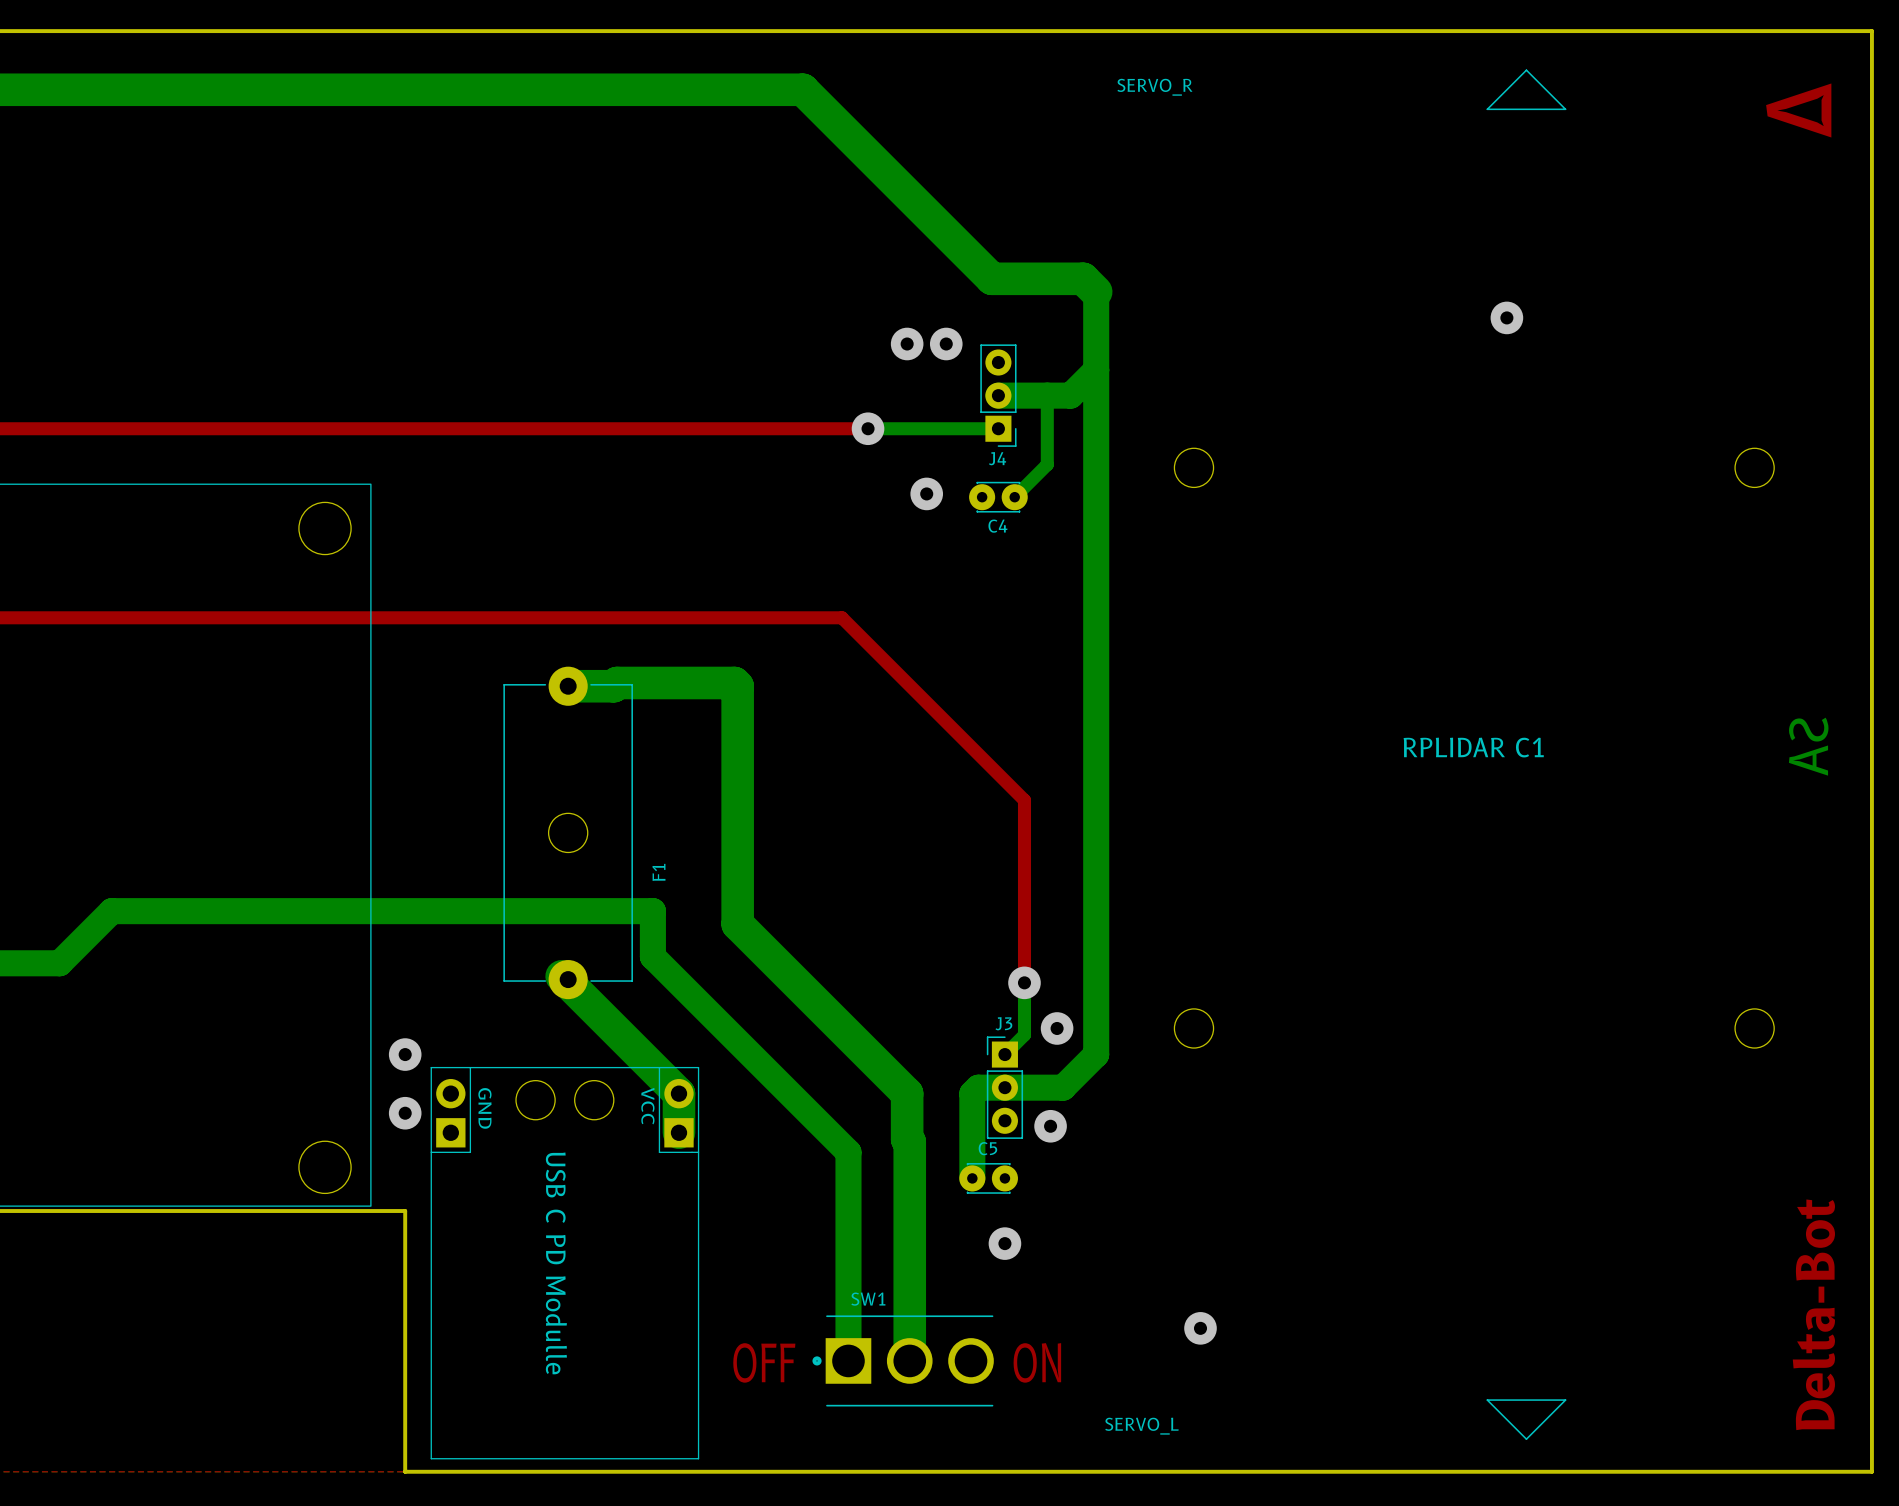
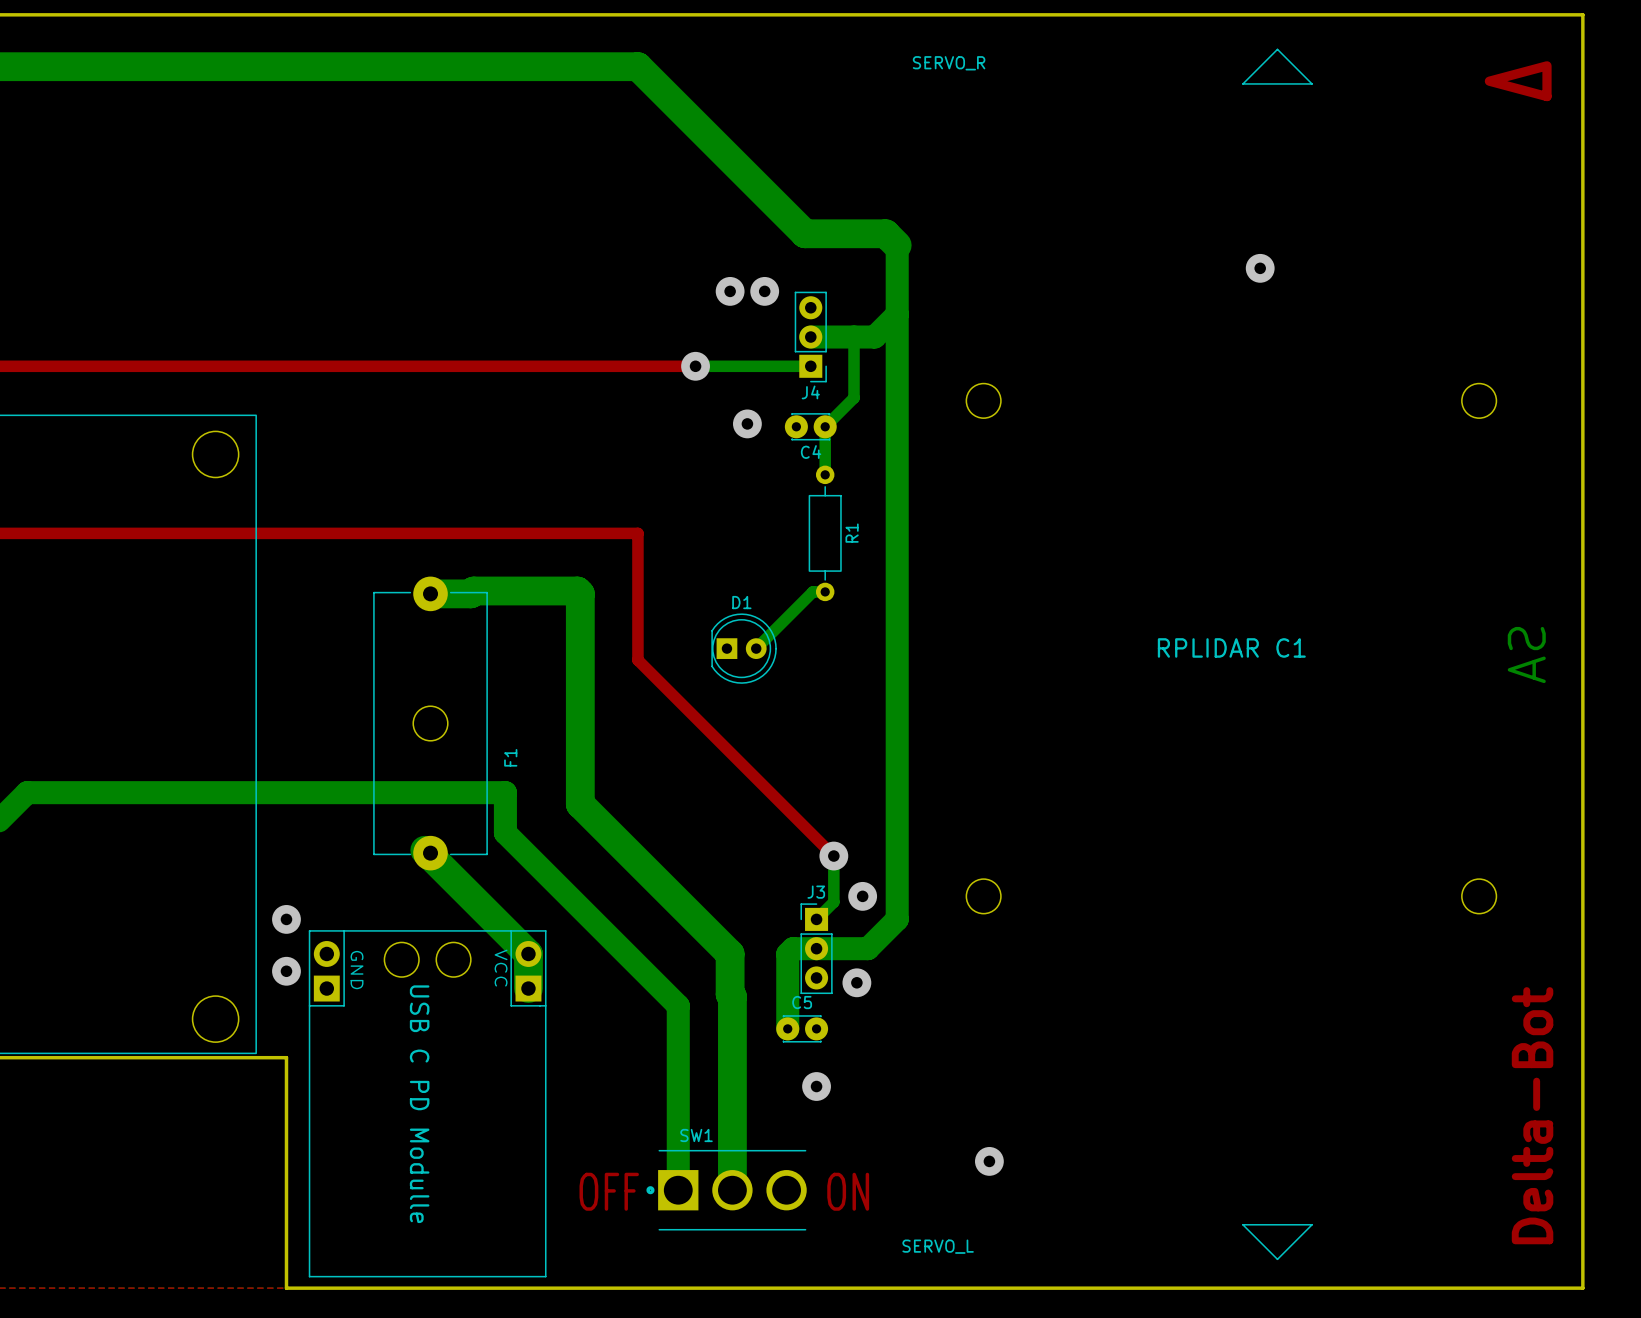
bottom track: none -> (825, 426) (825, 474)
top track: (802, 617) (841, 617) (1024, 800) (1024, 982) -> (637, 533) (637, 660) (833, 856)
R1: none -> (825, 533)
bottom track: none -> (825, 591) (812, 591) (756, 648)
D1: none -> (744, 648)

